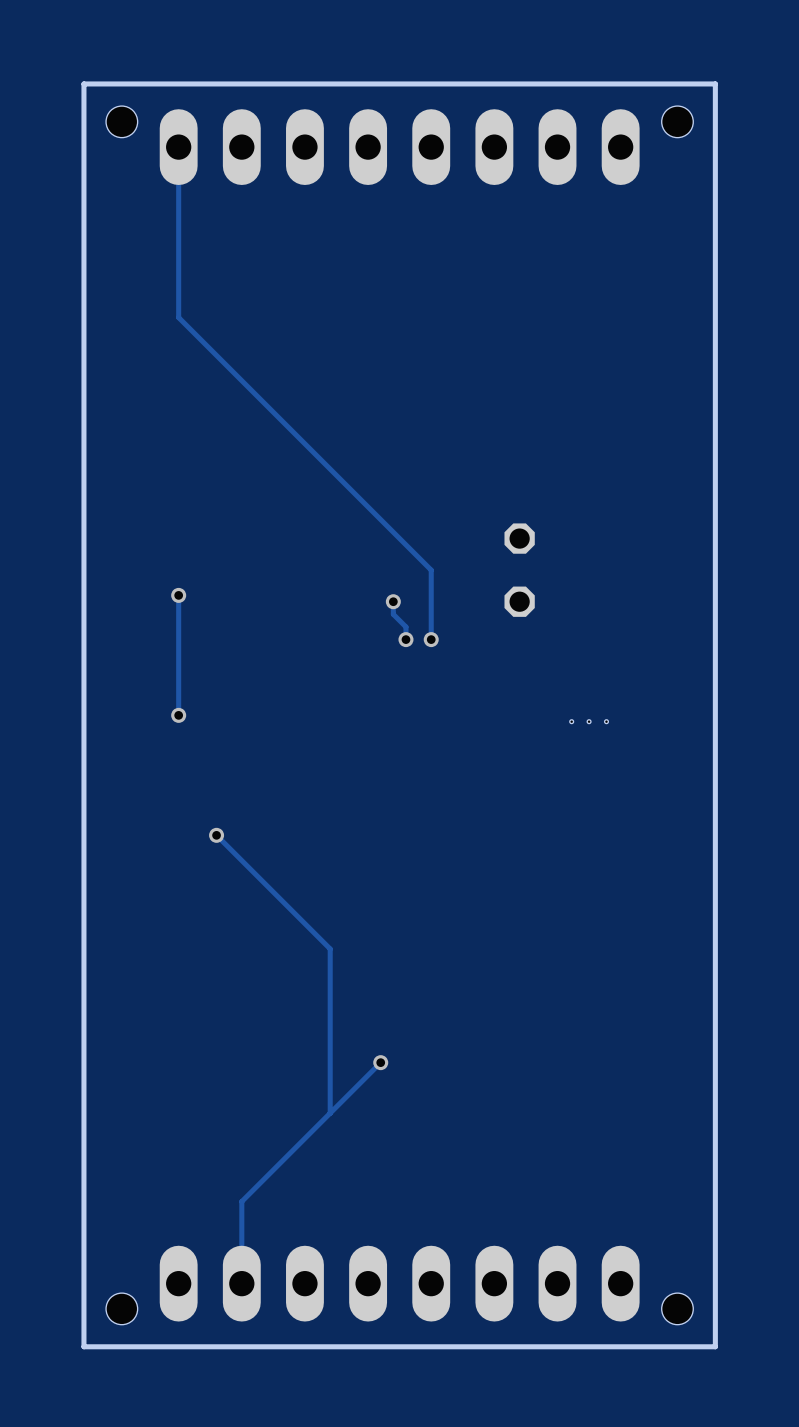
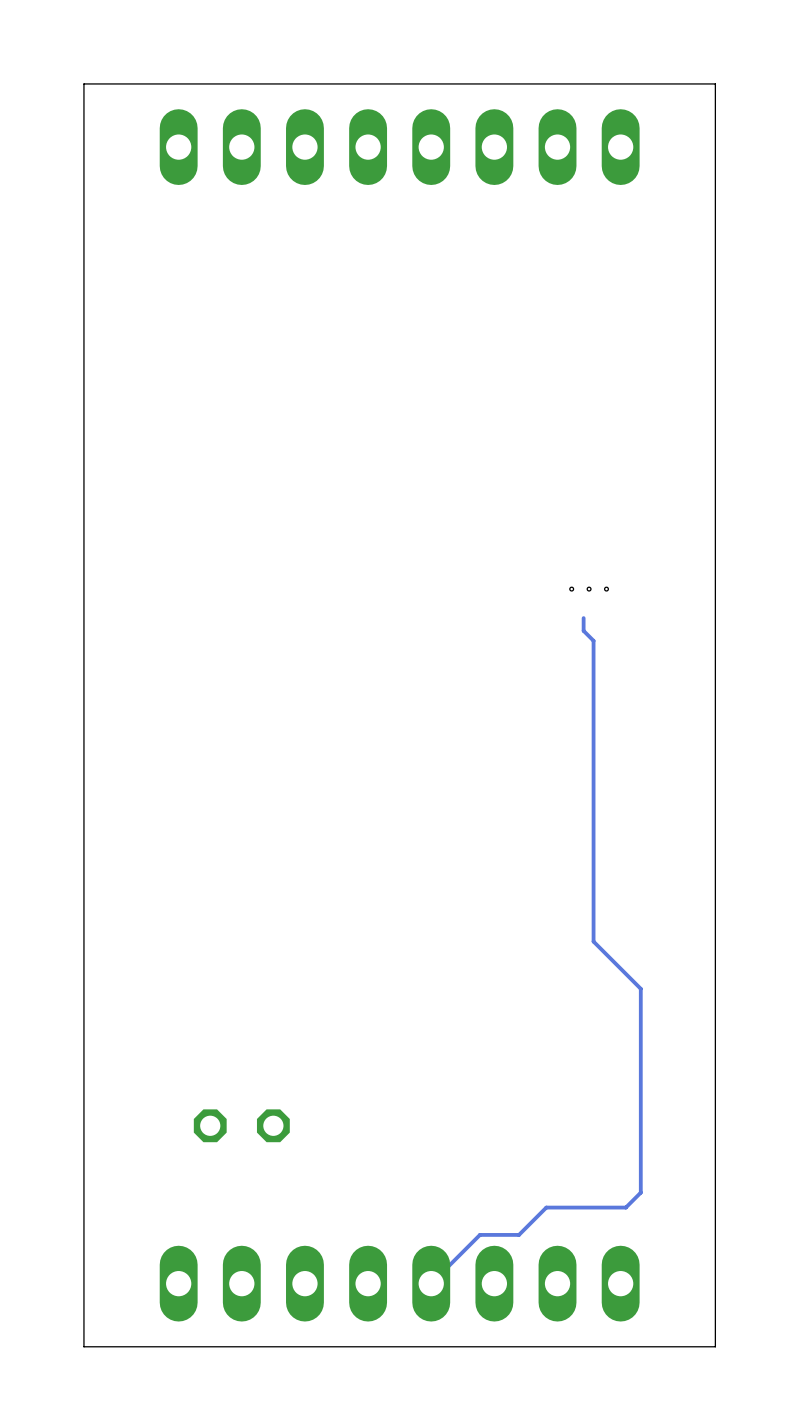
board edge width: thick (715, 83) (715, 1346) (83, 1346) (83, 83) (715, 83) -> thin (715, 83) (715, 1346) (83, 1346) (83, 83) (715, 83)
hole: (121, 121) -> none
hole: (677, 121) -> none
track: (178, 147) (178, 317) (431, 570) (431, 639) -> none
part: (519, 570) -> none
track: (178, 595) (178, 715) -> none
via: (178, 595) -> none
track: (393, 601) (393, 614) (405, 626) (405, 639) -> none
via: (393, 601) -> none
track: none -> (583, 618) (583, 630) (593, 640) (593, 941) (640, 988) (640, 1192) (625, 1207) (546, 1207) (518, 1234) (479, 1234) (431, 1283)
via: (405, 639) -> none
via: (431, 639) -> none
via: (178, 715) -> none
part position: (589, 721) -> (589, 589)
track: (216, 835) (330, 948) (330, 1113) -> none
via: (216, 835) -> none
track: (380, 1062) (241, 1201) (241, 1283) -> none
via: (380, 1062) -> none
part: none -> (241, 1125)
hole: (121, 1308) -> none
hole: (677, 1308) -> none

